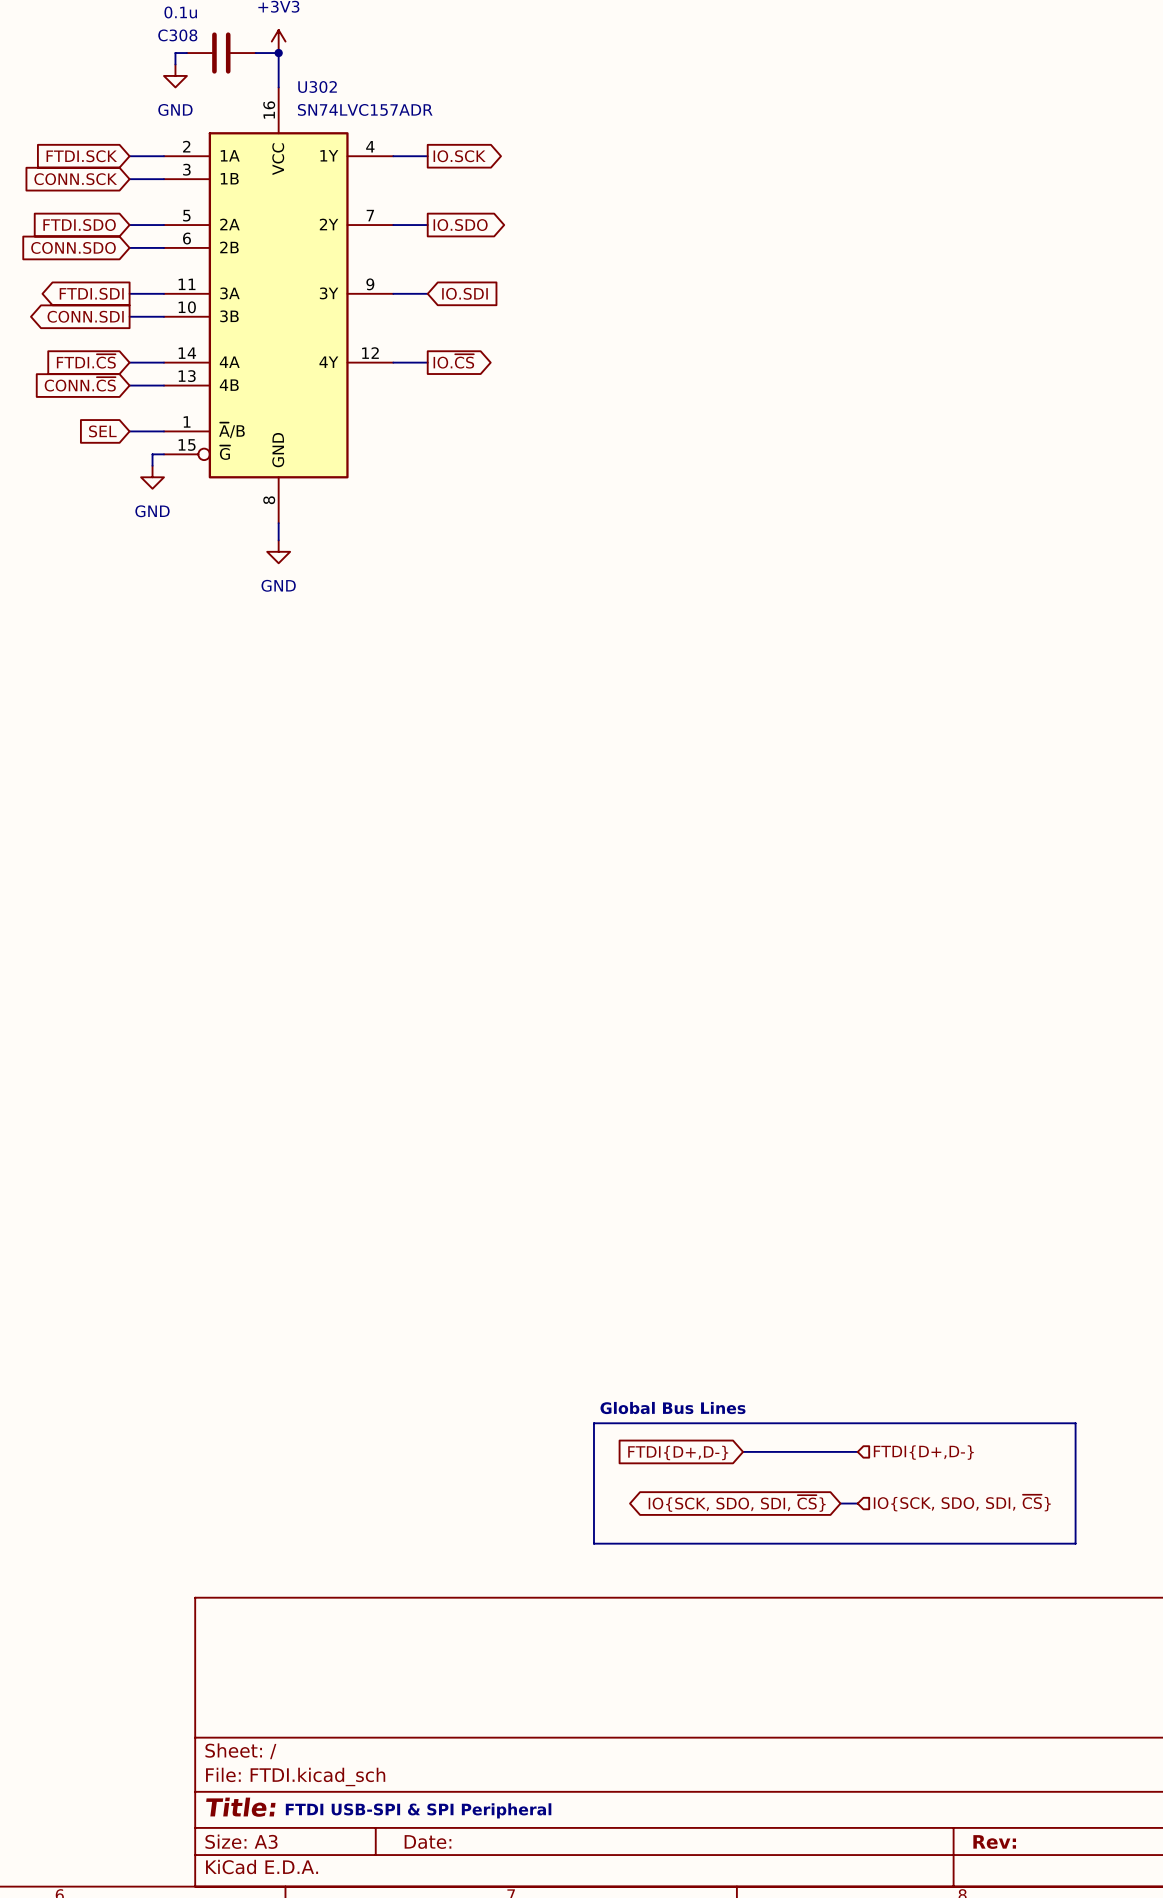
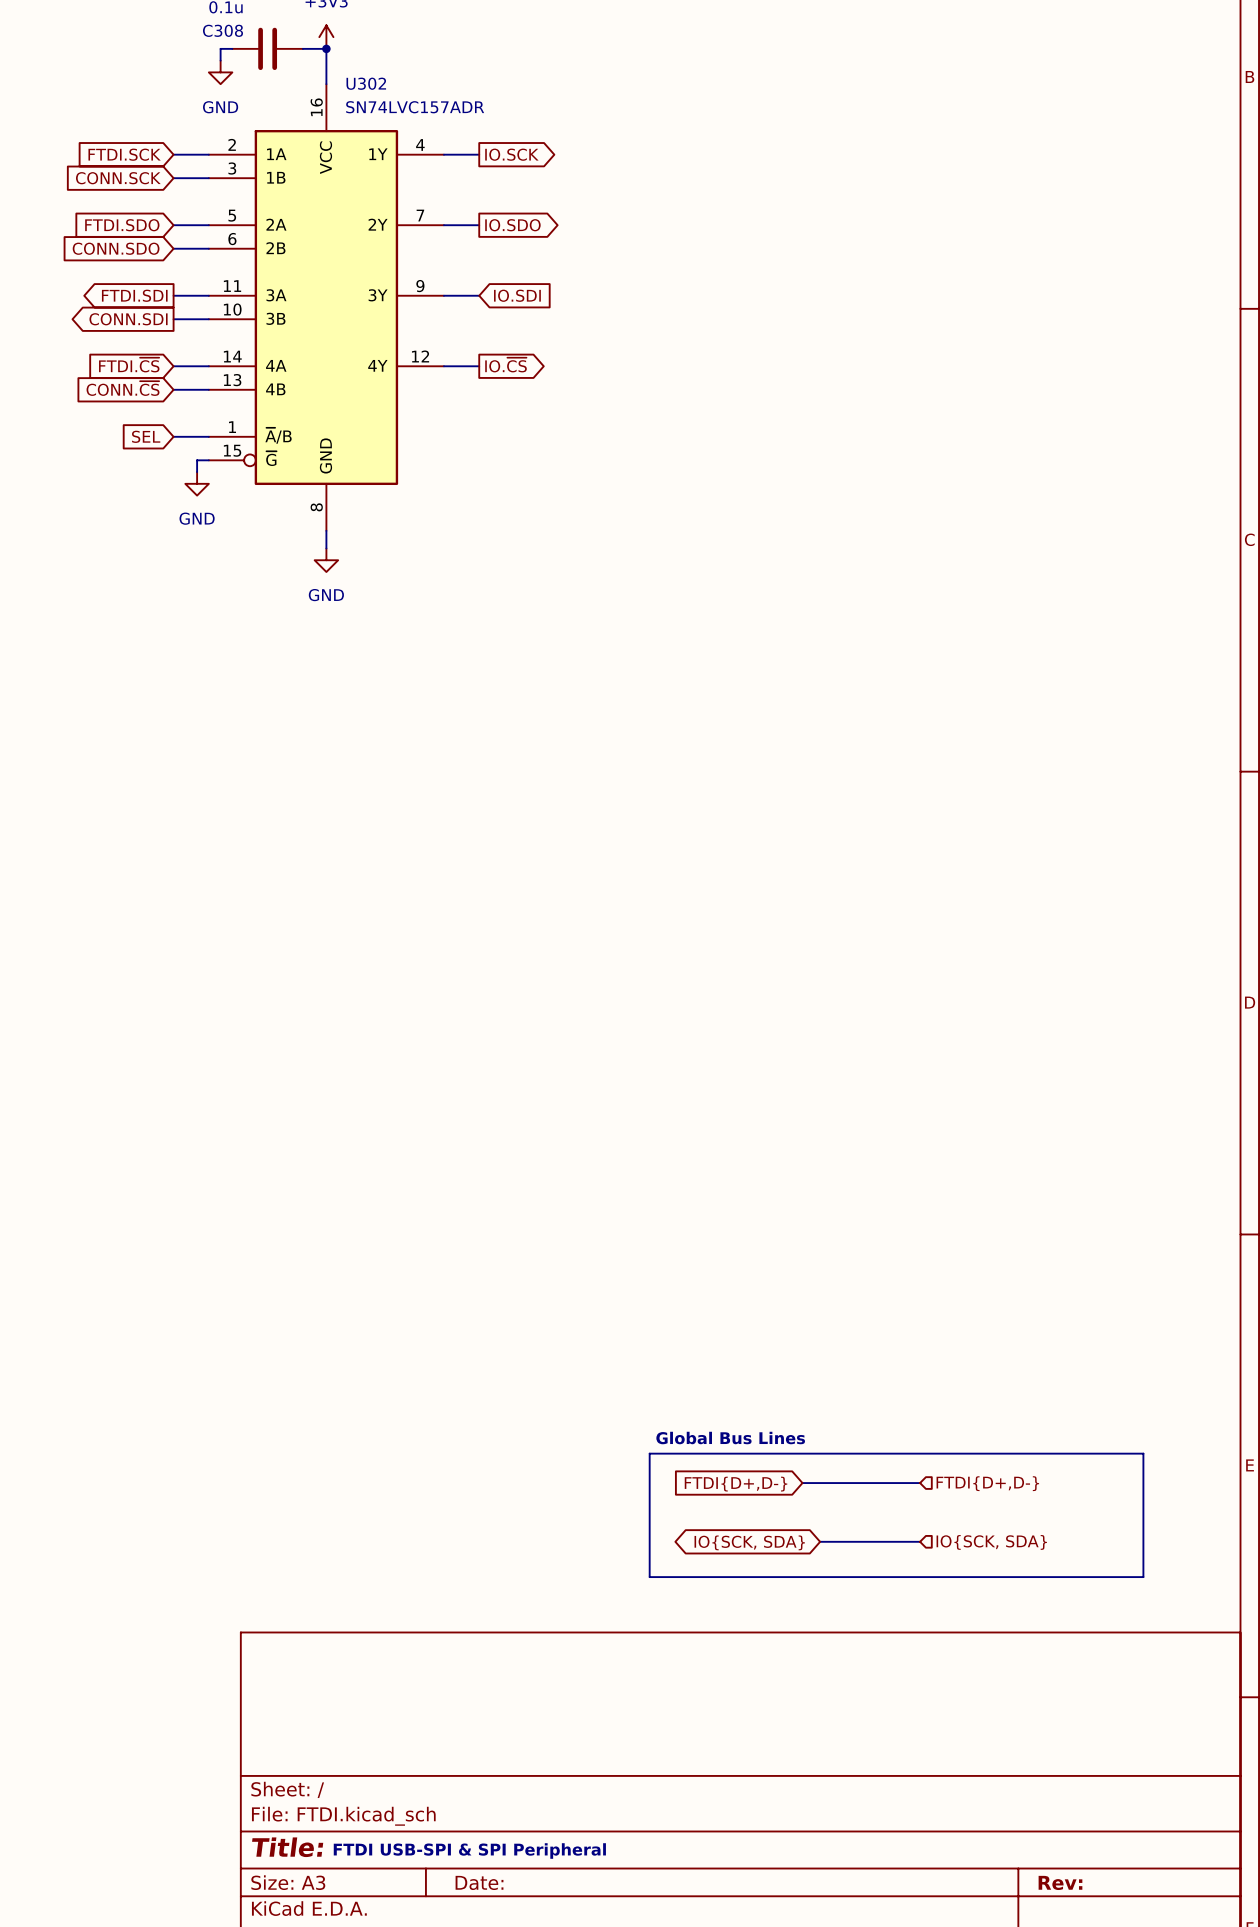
global label: IO{SCK, SDO, SDI, ~{CS}} (737, 1503) -> IO{SCK, SDA} (749, 1542)
bus: (840, 1503) (857, 1503) -> none
hierarchical label: IO{SCK, SDO, SDI, ~{CS}} (962, 1503) -> IO{SCK, SDA} (991, 1542)
bus: none -> (820, 1541) (920, 1541)

